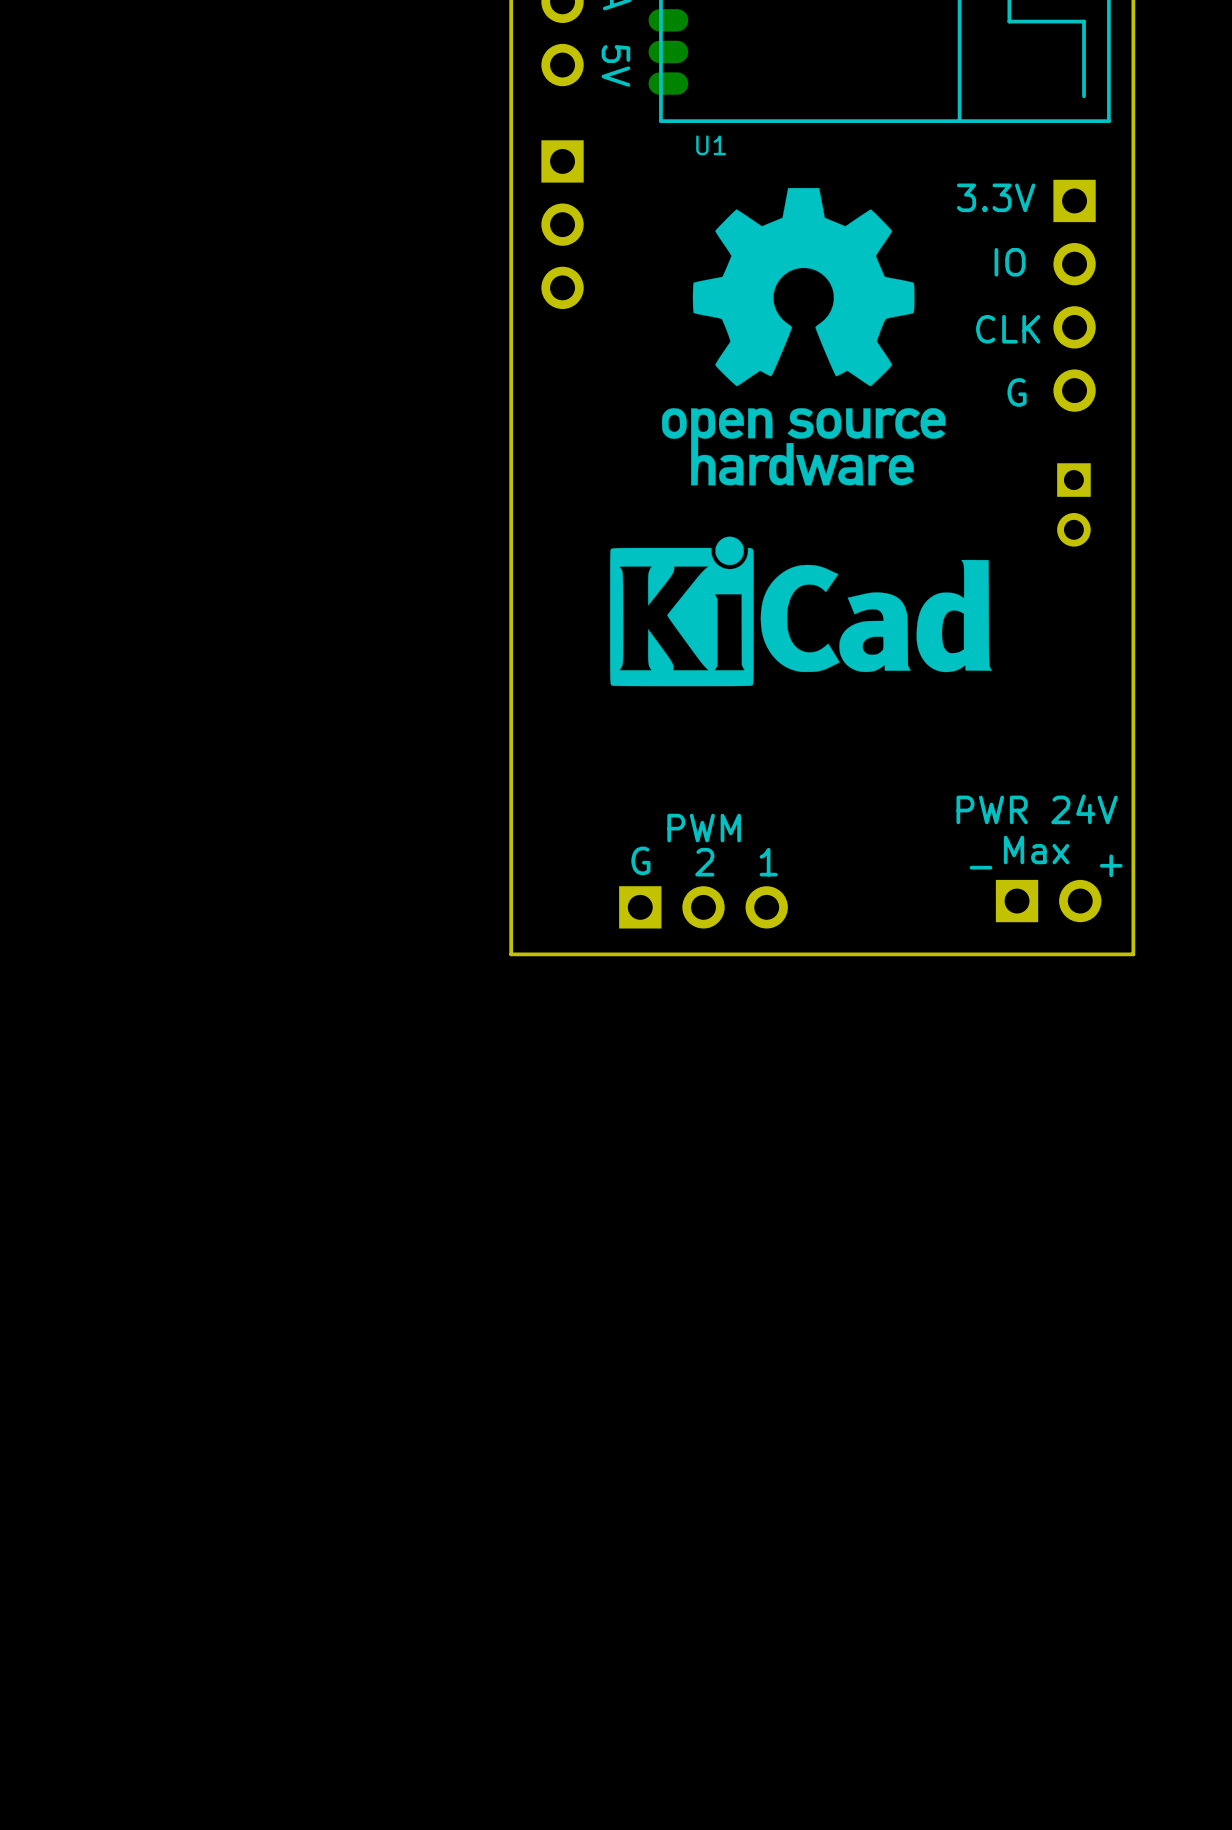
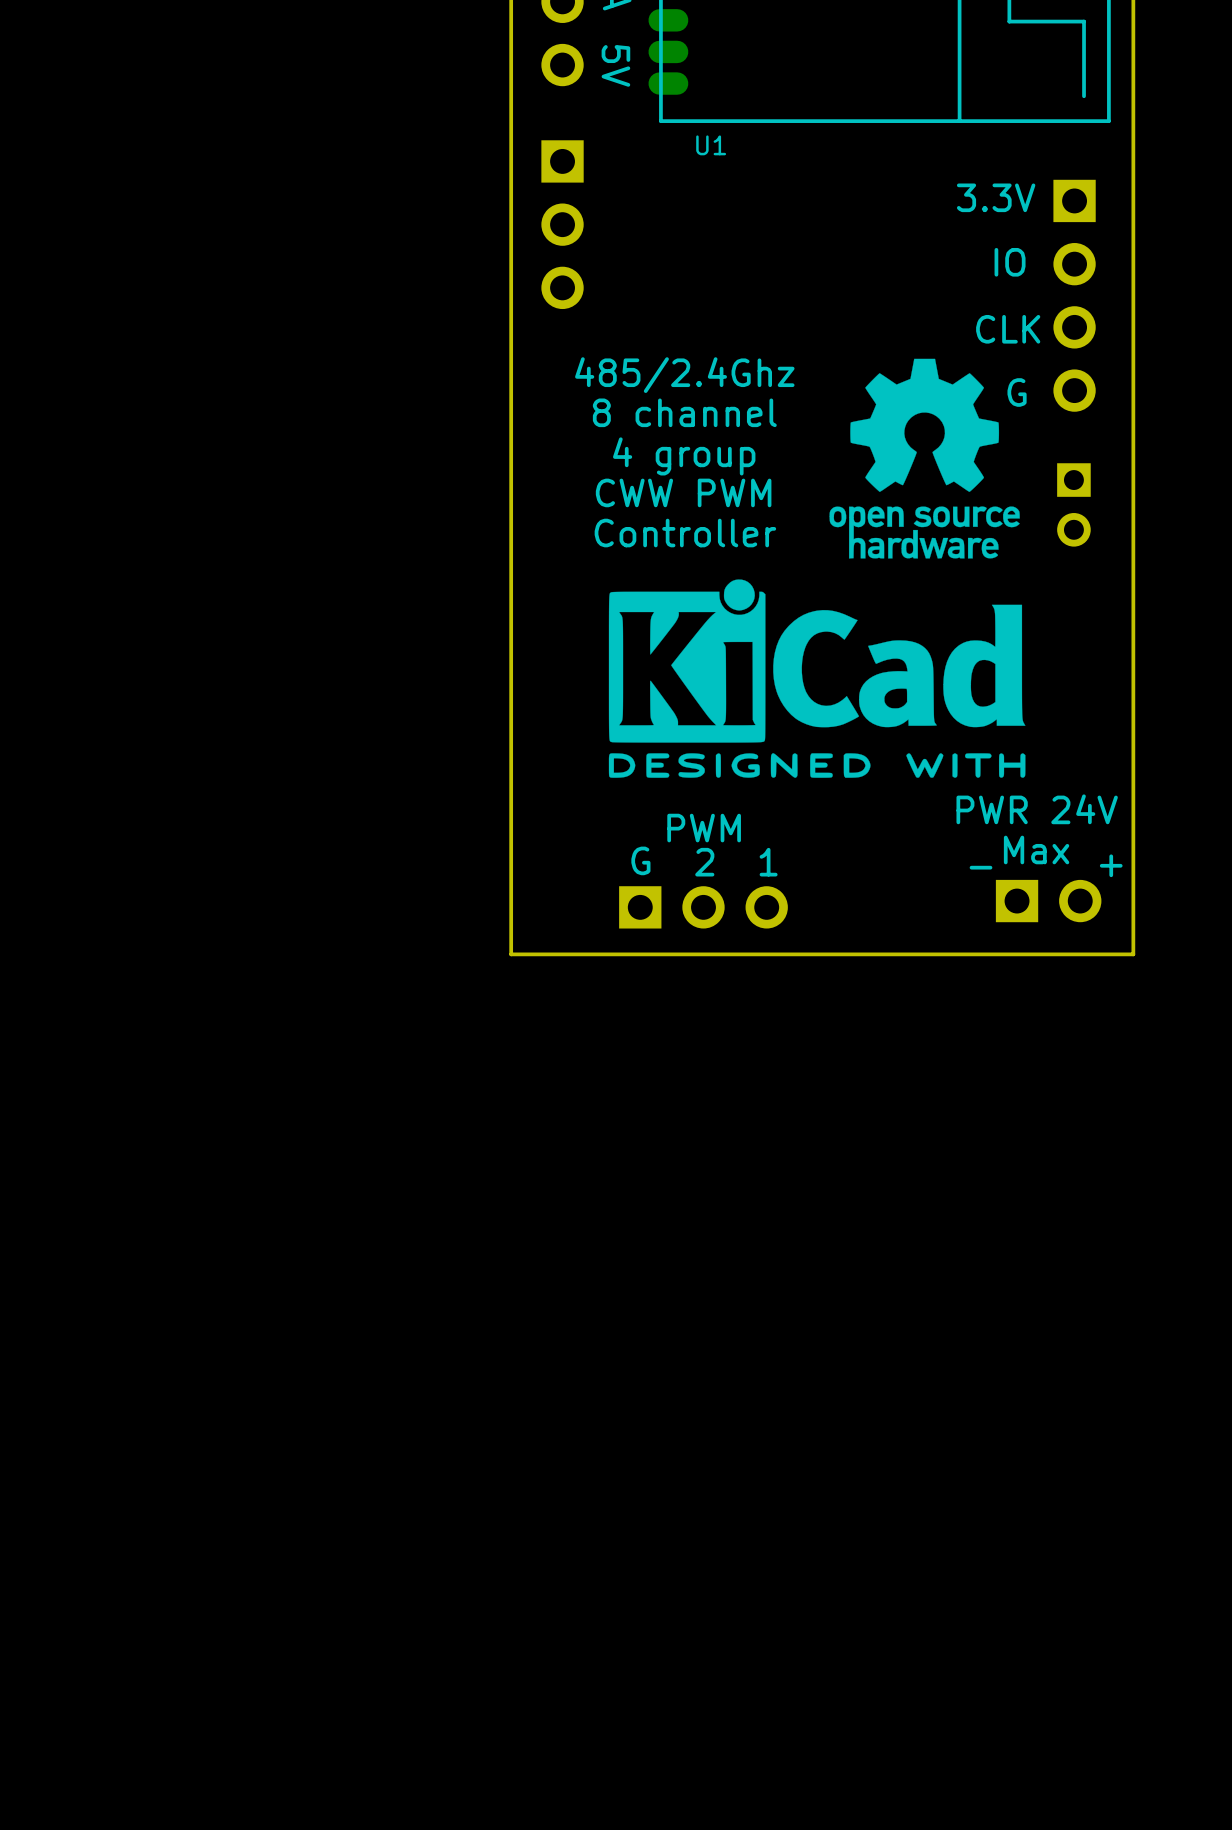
drawing: [661, 187, 946, 486] -> none
drawing: none -> [608, 358, 1026, 778]
text: none -> 485/2.4Ghz (684, 375)
text: none -> 8 channel (684, 412)
text: none -> 4 group (684, 456)
text: none -> CWW PWM (683, 492)
text: none -> Controller (685, 533)
drawing: [610, 536, 993, 687] -> none

